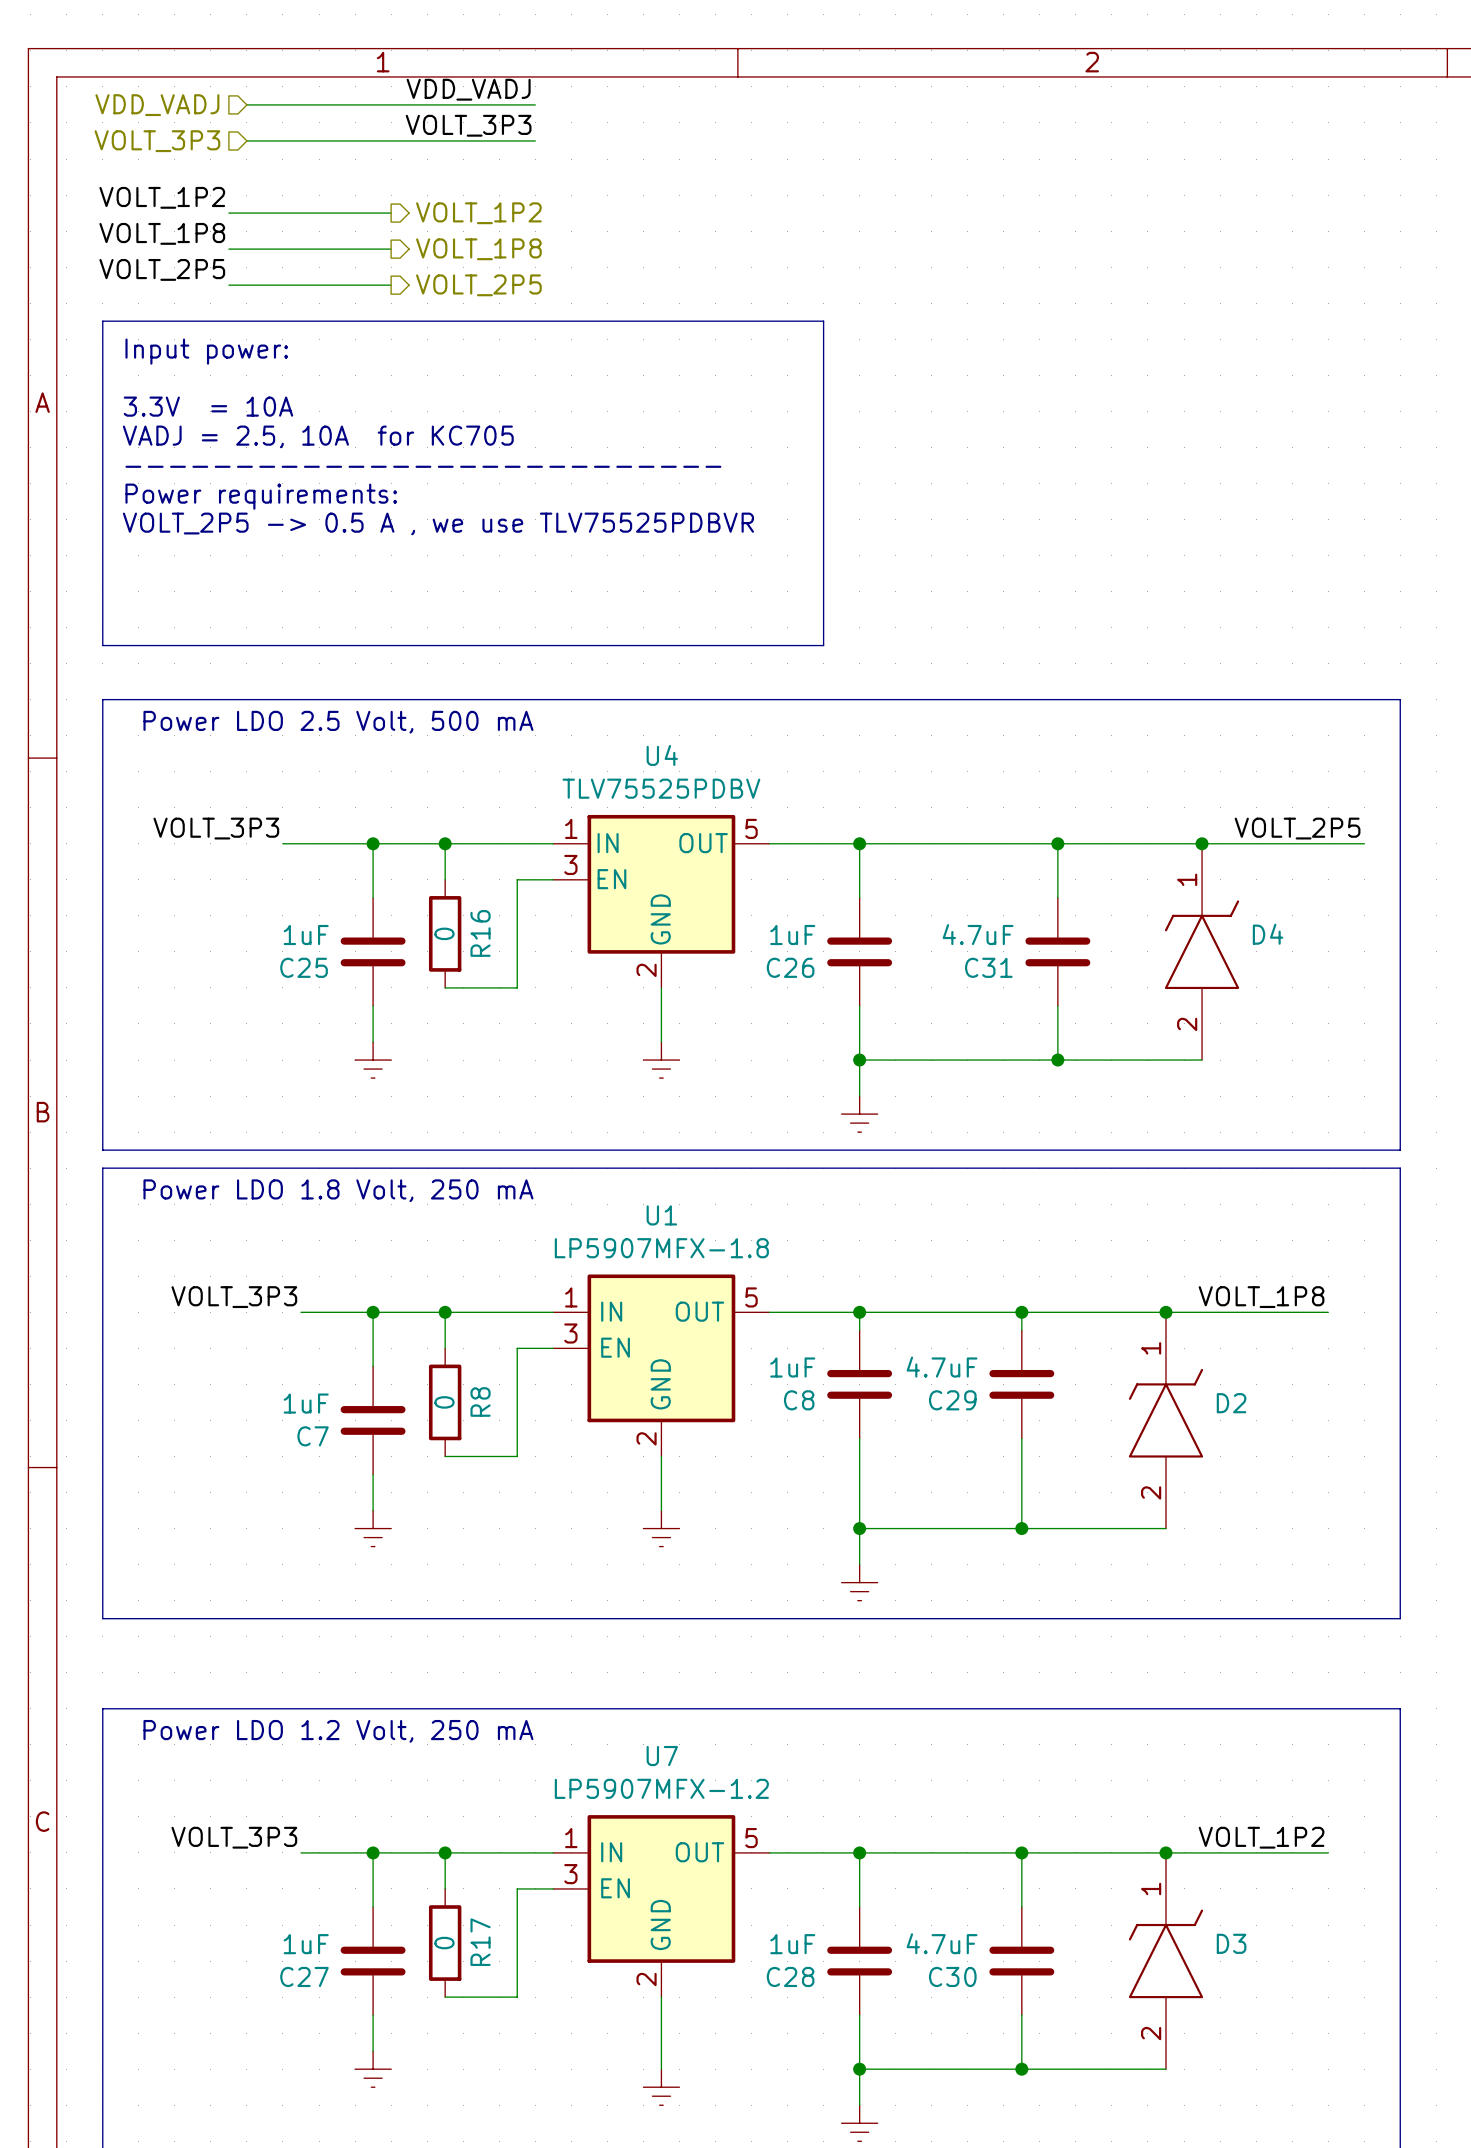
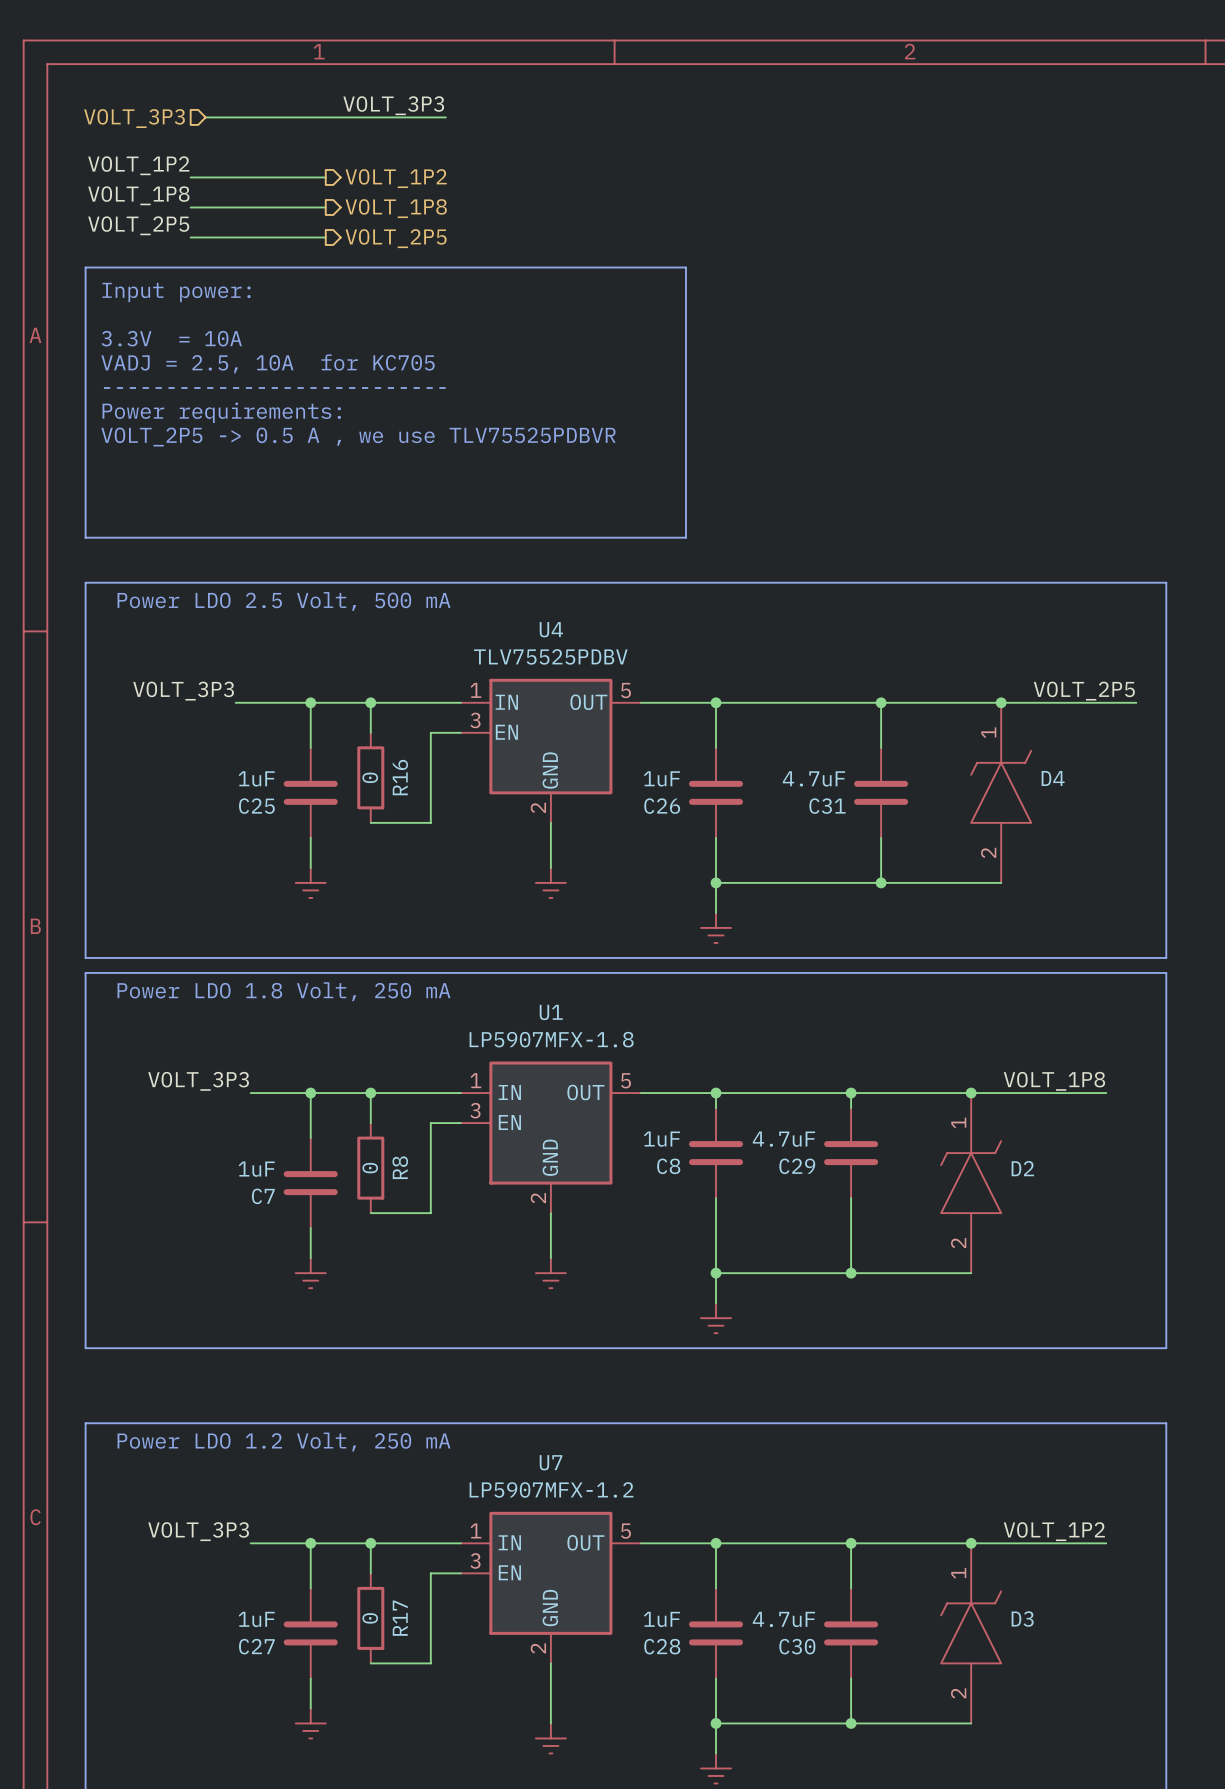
label: VDD_VADJ (468, 89) -> none
wire: (246, 104) (535, 104) -> none
hierarchical label: VDD_VADJ (157, 105) -> none

